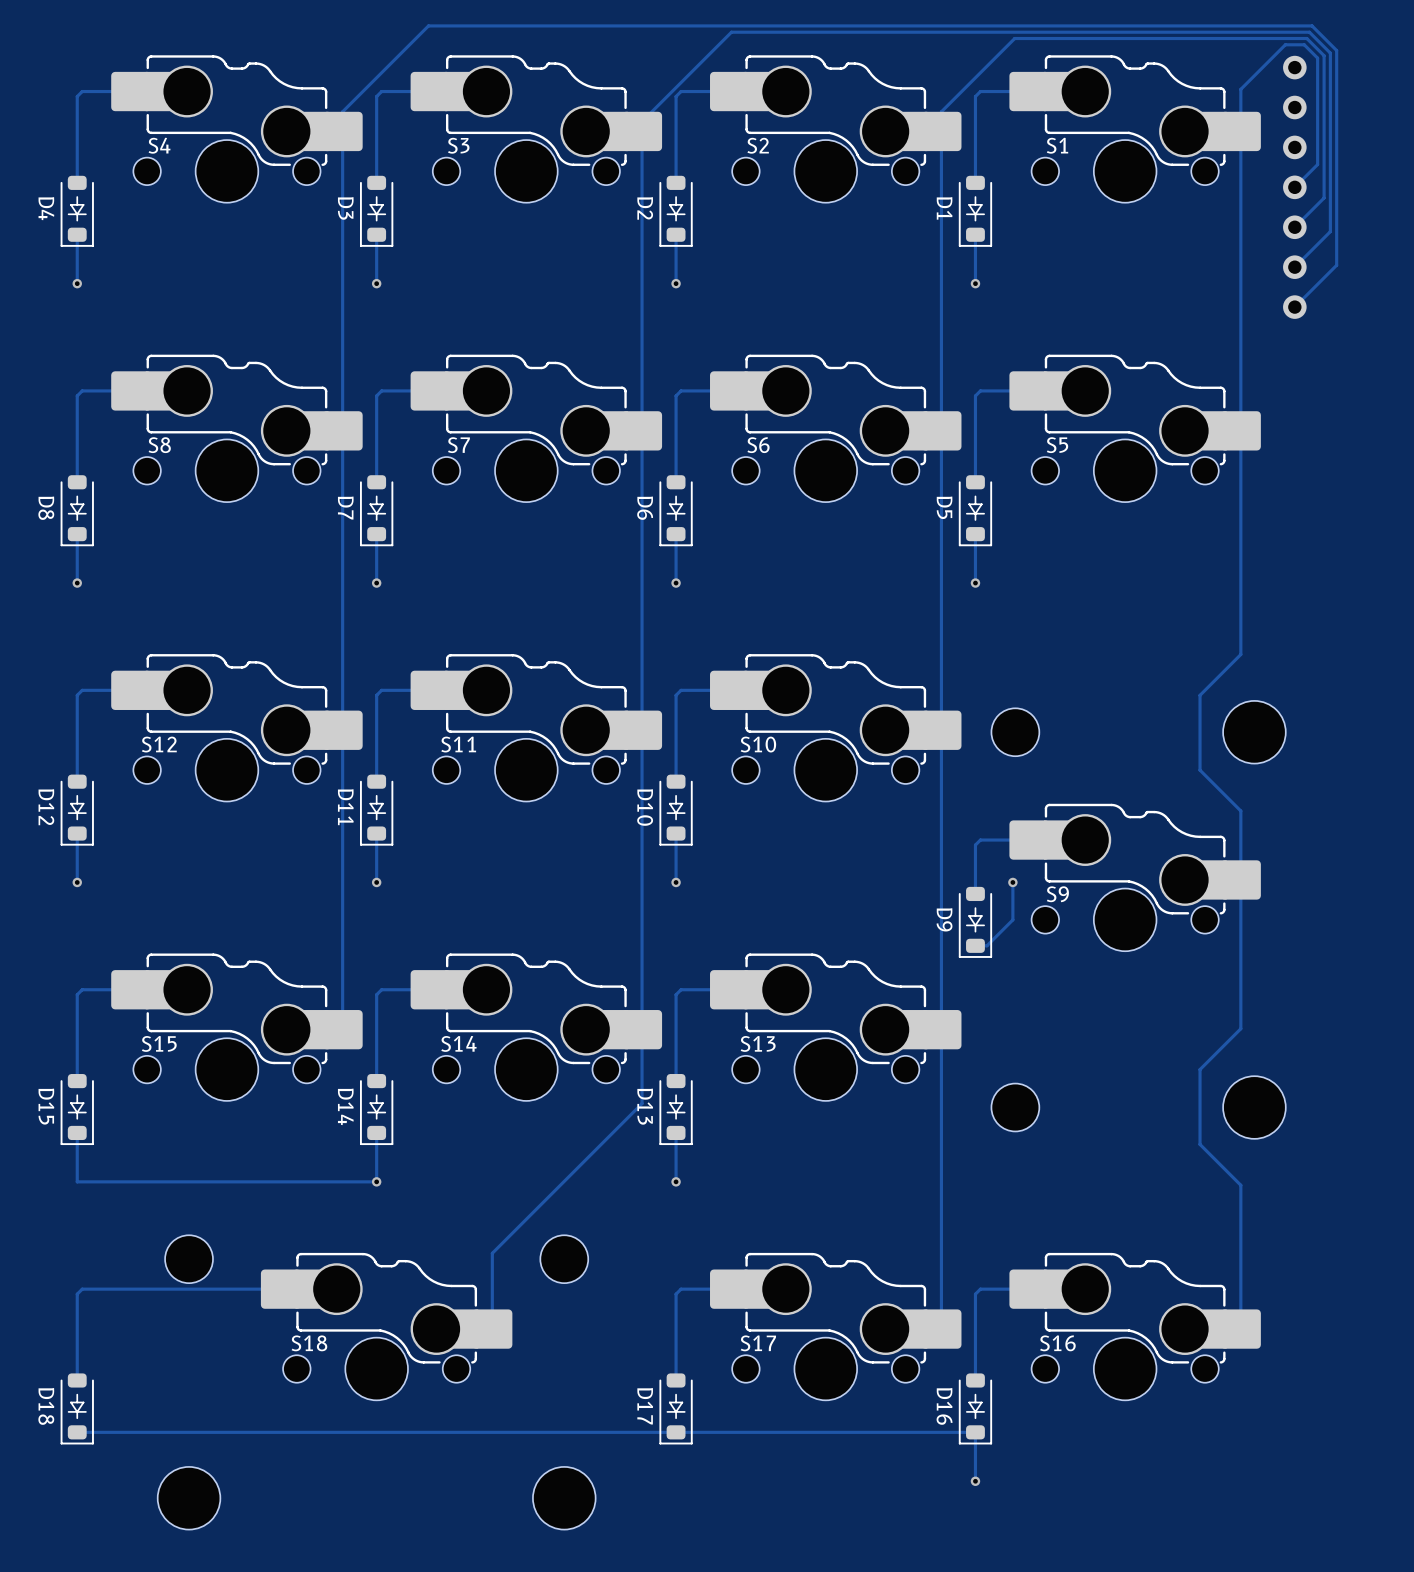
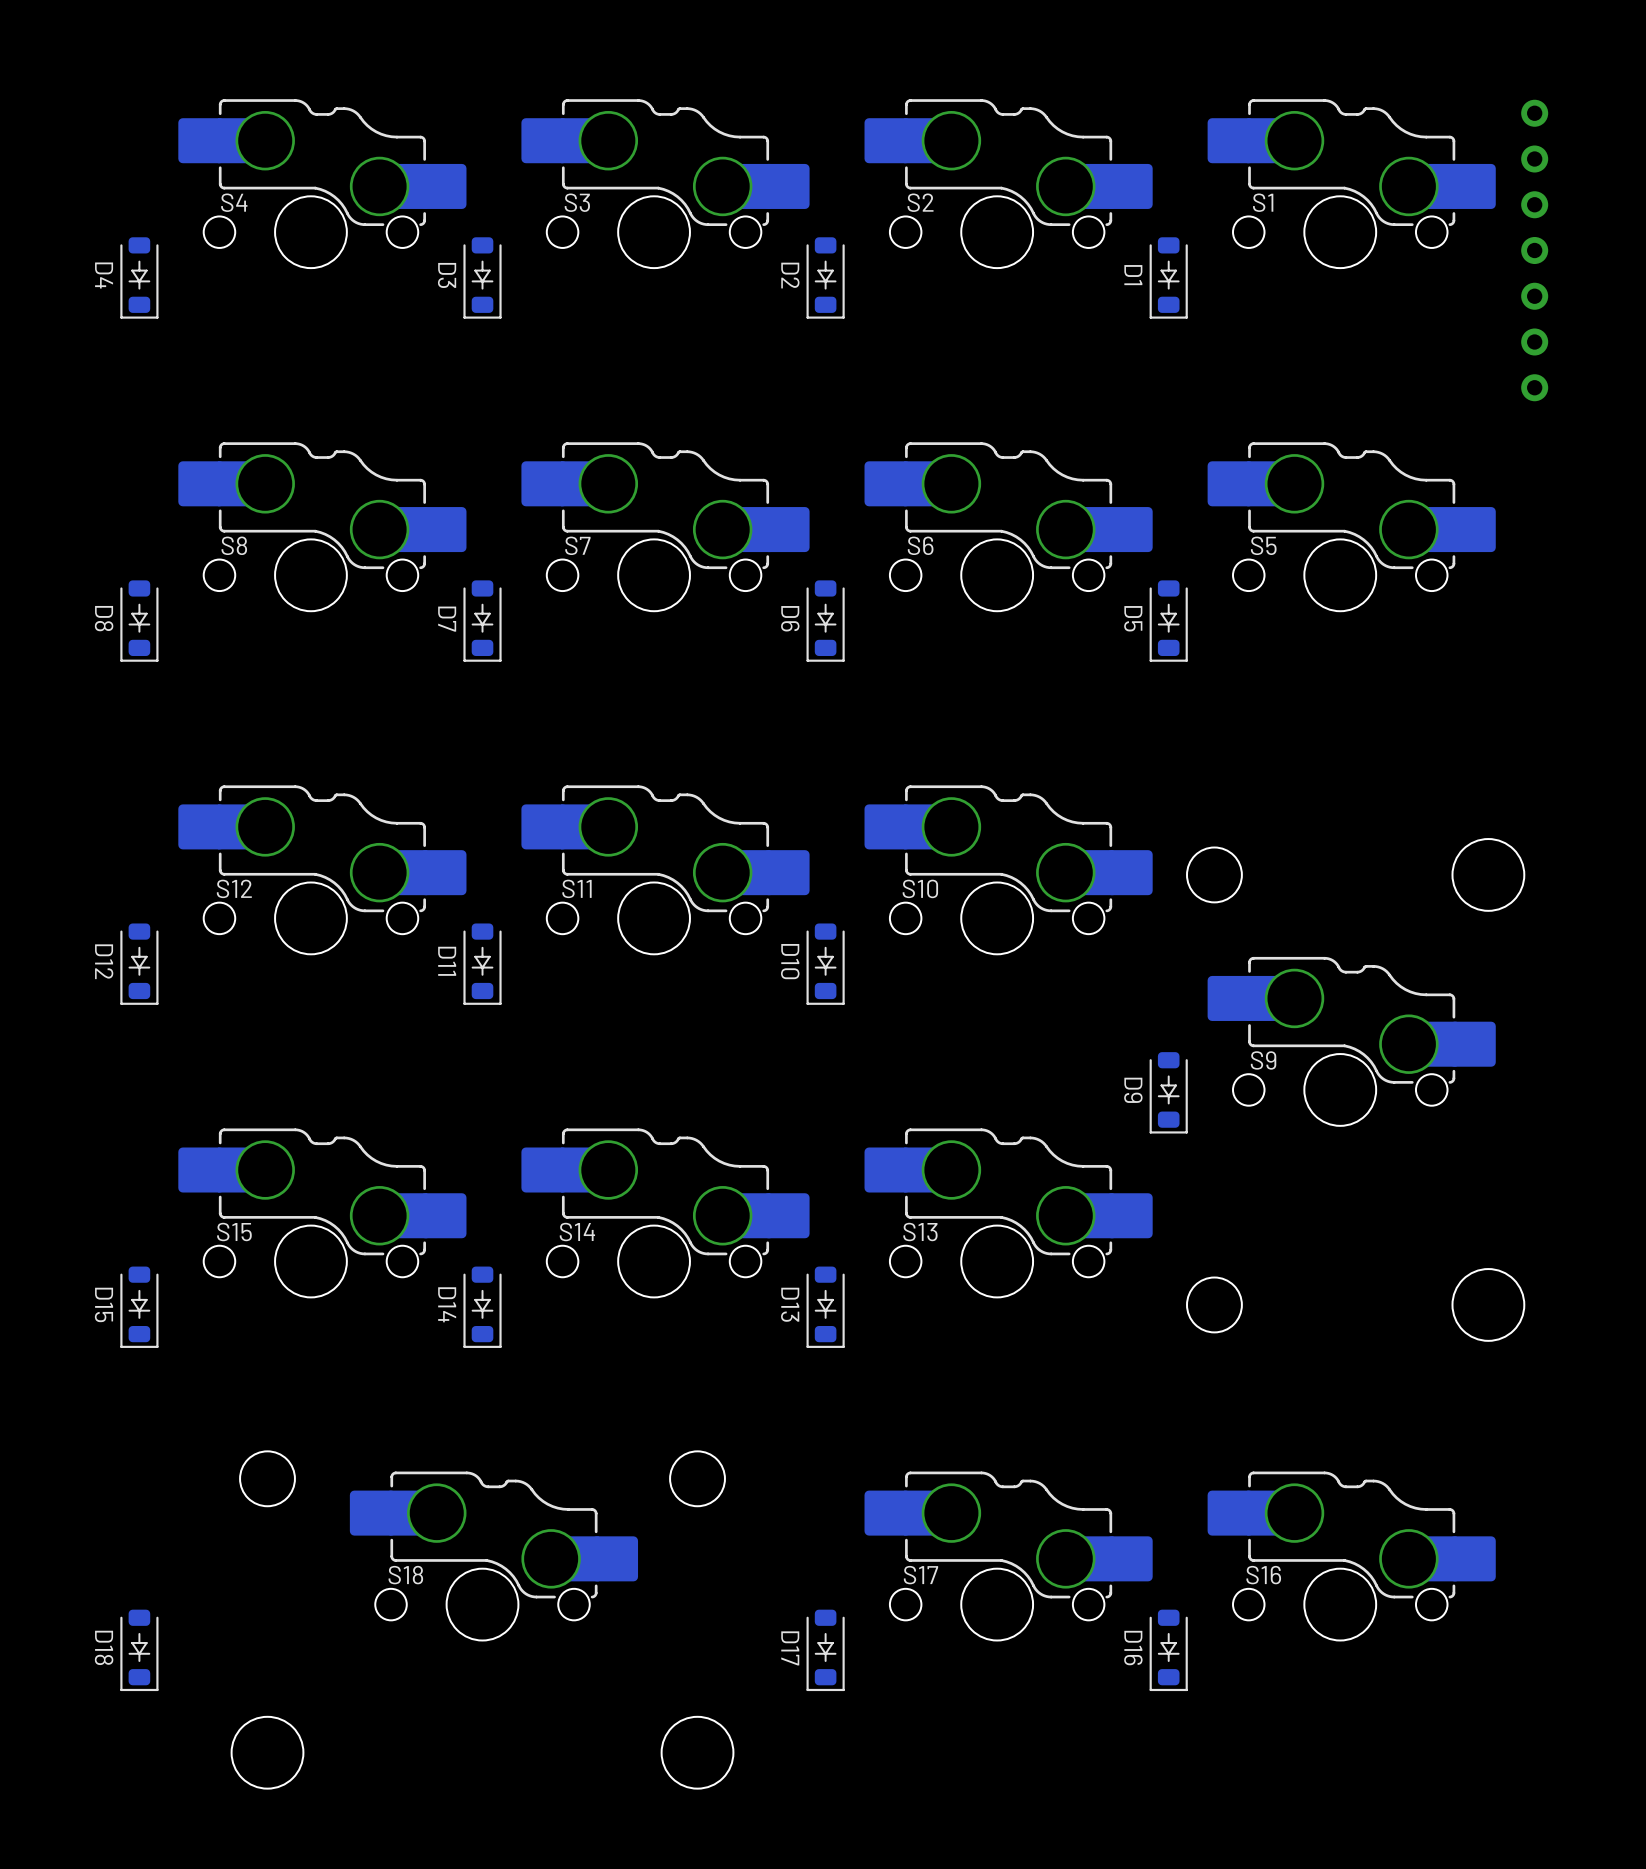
track: (131, 91) (82, 91) (77, 96) (77, 182) -> none
track: (430, 91) (381, 91) (376, 96) (376, 182) -> none
track: (730, 91) (681, 91) (676, 96) (676, 182) -> none
track: (1029, 91) (980, 91) (975, 96) (975, 182) -> none
track: (1294, 187) (1317, 164) (1317, 58) (1304, 44) (1285, 44) (1240, 89) (1240, 654) (1200, 695) (1200, 770) (1240, 811) (1240, 1028) (1200, 1069) (1200, 1144) (1240, 1185) (1240, 1329) -> none
track: (1294, 227) (1324, 198) (1324, 55) (1306, 38) (1014, 38) (941, 111) (941, 1329) -> none
track: (77, 234) (77, 283) -> none
track: (376, 234) (376, 283) -> none
track: (676, 234) (676, 283) -> none
track: (975, 234) (975, 283) -> none
track: (1294, 267) (1330, 231) (1330, 53) (1309, 32) (731, 32) (642, 121) (642, 1103) (492, 1253) (492, 1329) -> none
via: (77, 283) -> none
via: (376, 283) -> none
via: (676, 283) -> none
via: (975, 283) -> none
track: (1294, 307) (1336, 265) (1336, 50) (1312, 25) (428, 25) (342, 111) (342, 1029) -> none
track: (131, 390) (82, 390) (77, 395) (77, 482) -> none
track: (430, 390) (381, 390) (376, 395) (376, 482) -> none
track: (730, 390) (681, 390) (676, 395) (676, 482) -> none
track: (1029, 390) (980, 390) (975, 395) (975, 482) -> none
track: (77, 534) (77, 583) -> none
track: (376, 534) (376, 583) -> none
track: (676, 534) (676, 583) -> none
track: (975, 534) (975, 583) -> none
via: (77, 583) -> none
via: (376, 583) -> none
via: (676, 583) -> none
via: (975, 583) -> none
track: (131, 690) (82, 690) (77, 695) (77, 781) -> none
track: (430, 690) (381, 690) (376, 695) (376, 781) -> none
track: (730, 690) (681, 690) (676, 695) (676, 781) -> none
track: (77, 833) (77, 882) -> none
track: (376, 833) (376, 882) -> none
track: (676, 833) (676, 882) -> none
track: (1029, 840) (980, 840) (975, 845) (975, 893) -> none
via: (77, 882) -> none
via: (376, 882) -> none
via: (676, 882) -> none
track: (1012, 882) (1012, 919) (986, 945) (975, 945) -> none
via: (1012, 882) -> none
track: (131, 989) (82, 989) (77, 994) (77, 1081) -> none
track: (430, 989) (381, 989) (376, 994) (376, 1081) -> none
track: (730, 989) (681, 989) (676, 994) (676, 1081) -> none
track: (376, 1132) (376, 1181) (77, 1181) (77, 1132) -> none
track: (676, 1132) (676, 1181) -> none
via: (376, 1181) -> none
via: (676, 1181) -> none
track: (280, 1289) (82, 1289) (77, 1294) (77, 1380) -> none
track: (730, 1289) (681, 1289) (676, 1294) (676, 1380) -> none
track: (1029, 1289) (980, 1289) (975, 1294) (975, 1380) -> none
track: (77, 1432) (975, 1432) (975, 1481) -> none
via: (975, 1481) -> none

